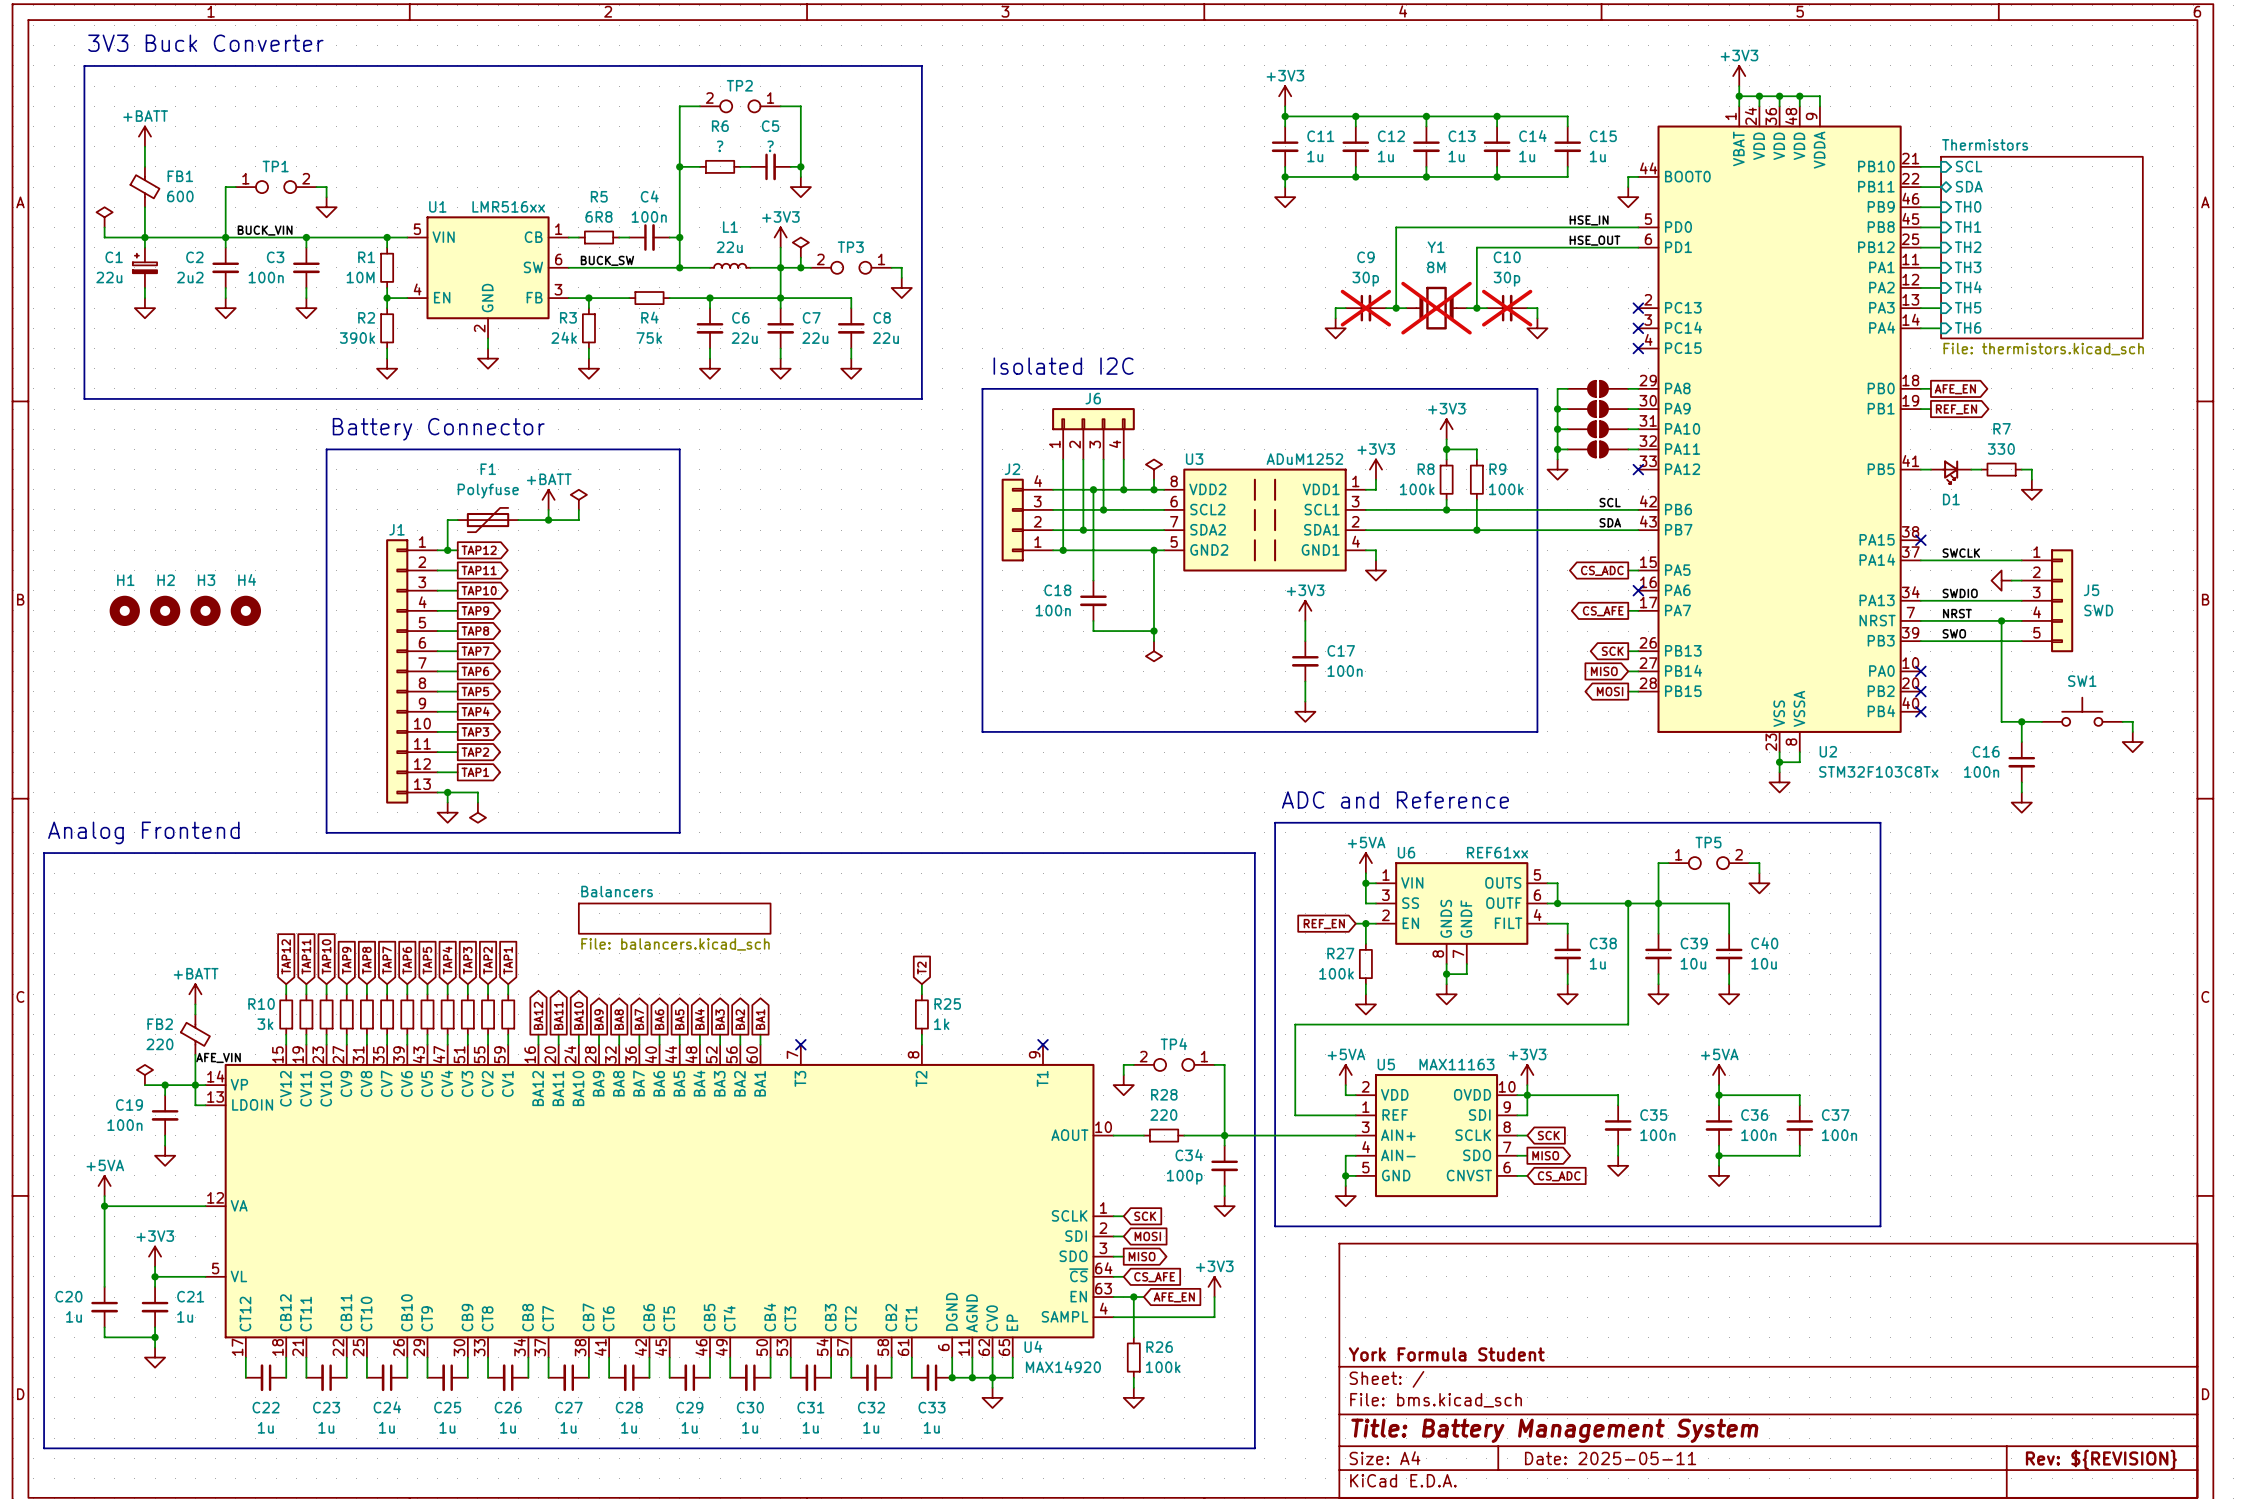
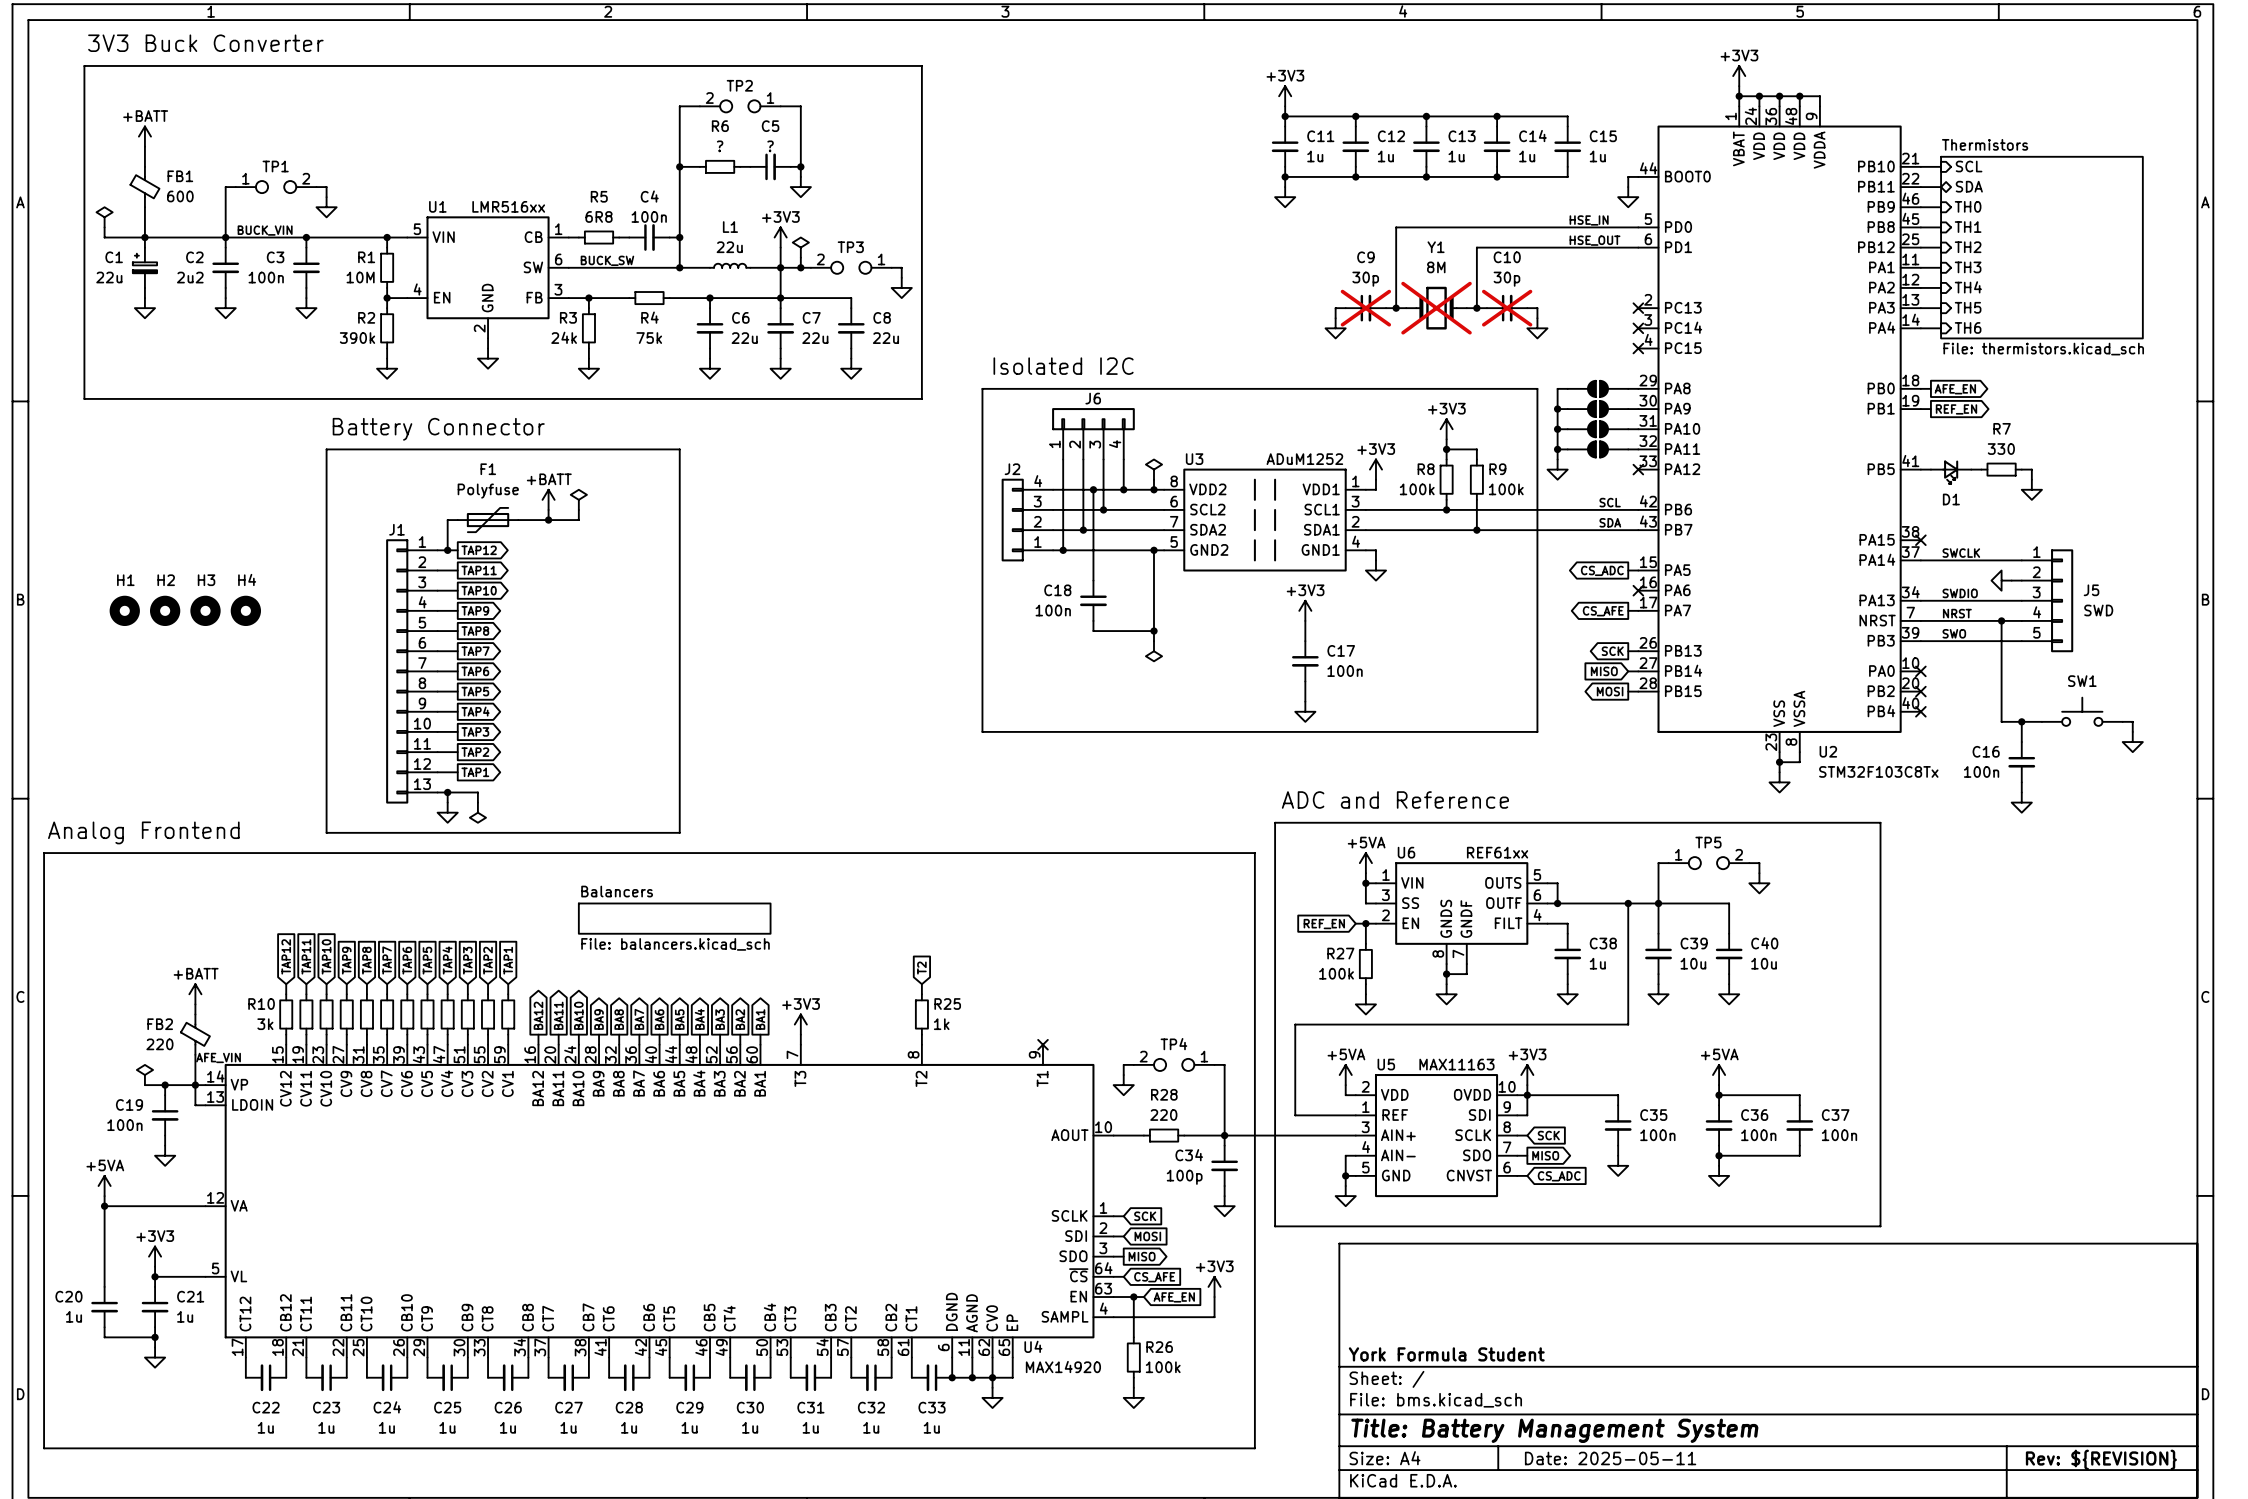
power symbol: none -> +3V3 (800, 1024)
wire: none -> (800, 1034) (800, 1044)
no-connect mark: (800, 1044) -> none

